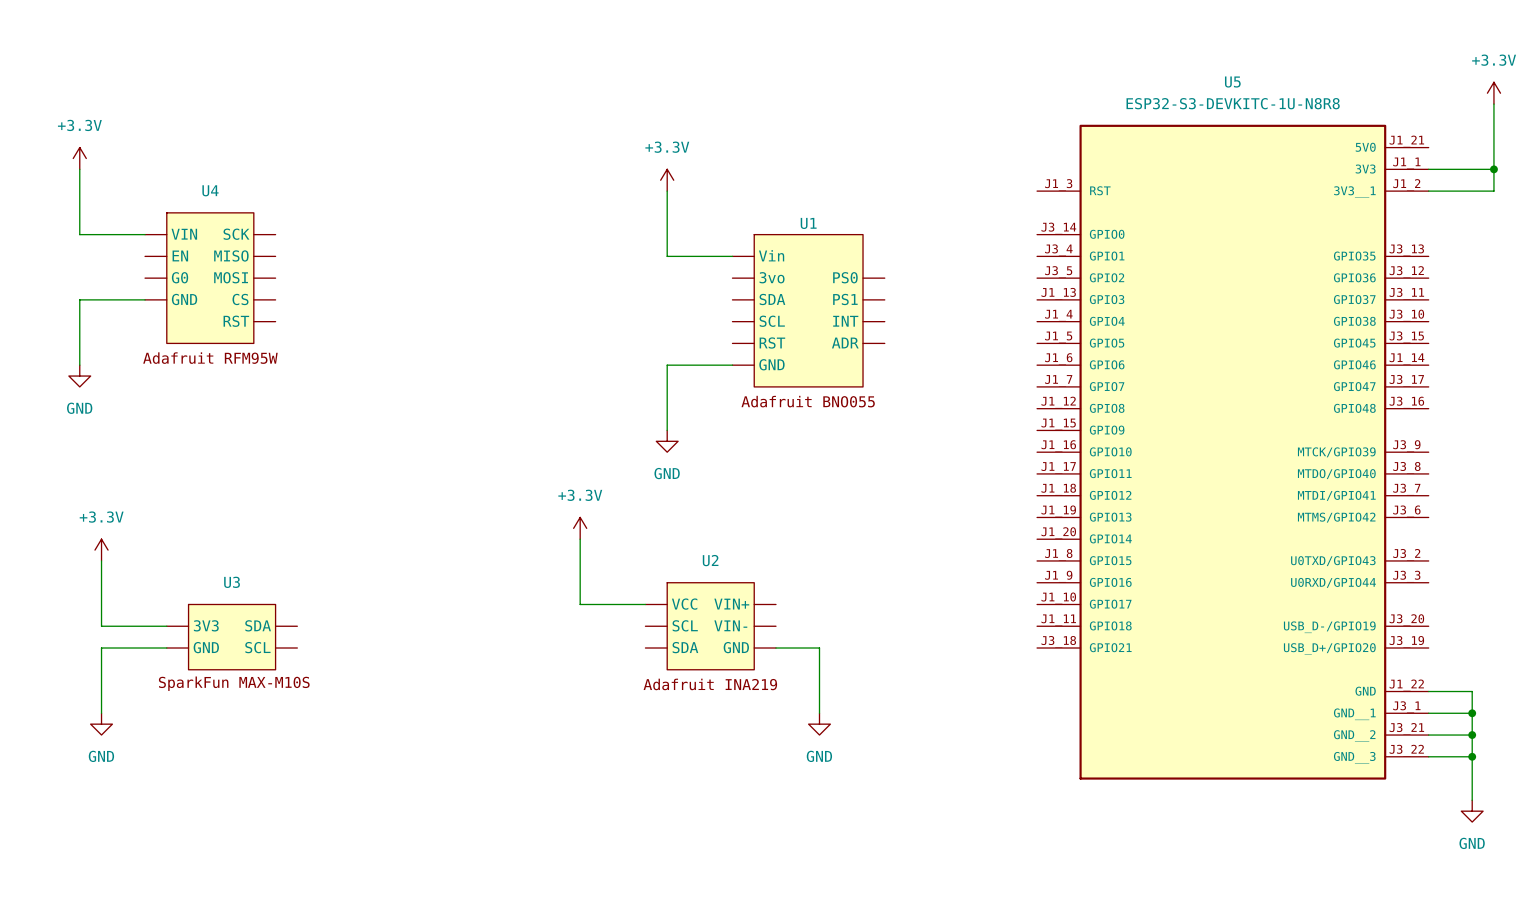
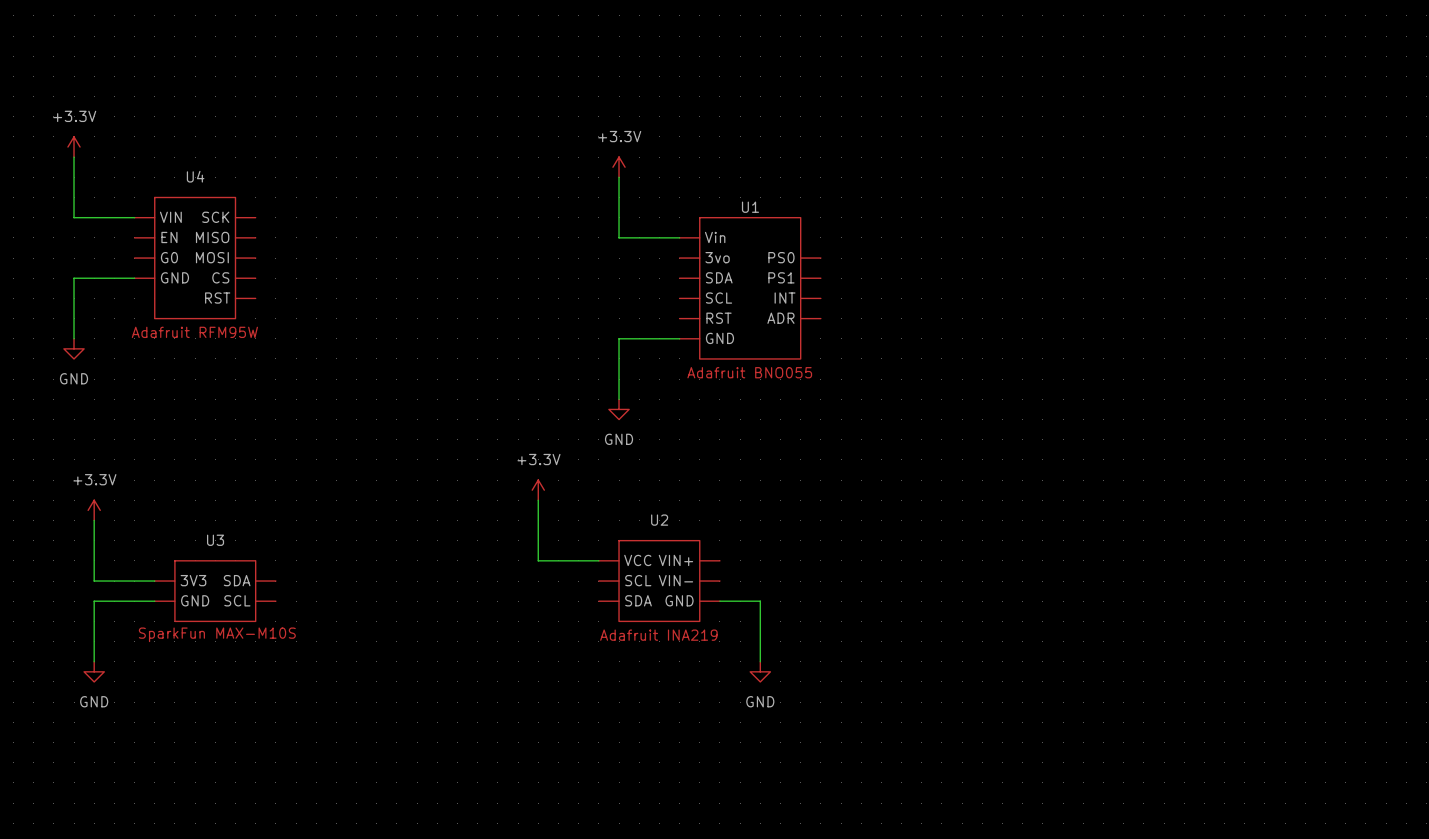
power symbol: +3.3V (1493, 93) -> none
wire: (1493, 104) (1493, 191) (1428, 191) -> none
wire: (1428, 169) (1493, 169) -> none
junction: (1493, 169) -> none
U5: ESP32-S3-DEVKITC-1U-N8R8 (1232, 452) -> none
wire: (1428, 691) (1472, 691) (1472, 800) -> none
wire: (1428, 713) (1472, 713) -> none
junction: (1472, 713) -> none
wire: (1428, 735) (1472, 735) -> none
junction: (1472, 735) -> none
wire: (1428, 756) (1472, 756) -> none
junction: (1472, 756) -> none
power symbol: GND (1472, 811) -> none

